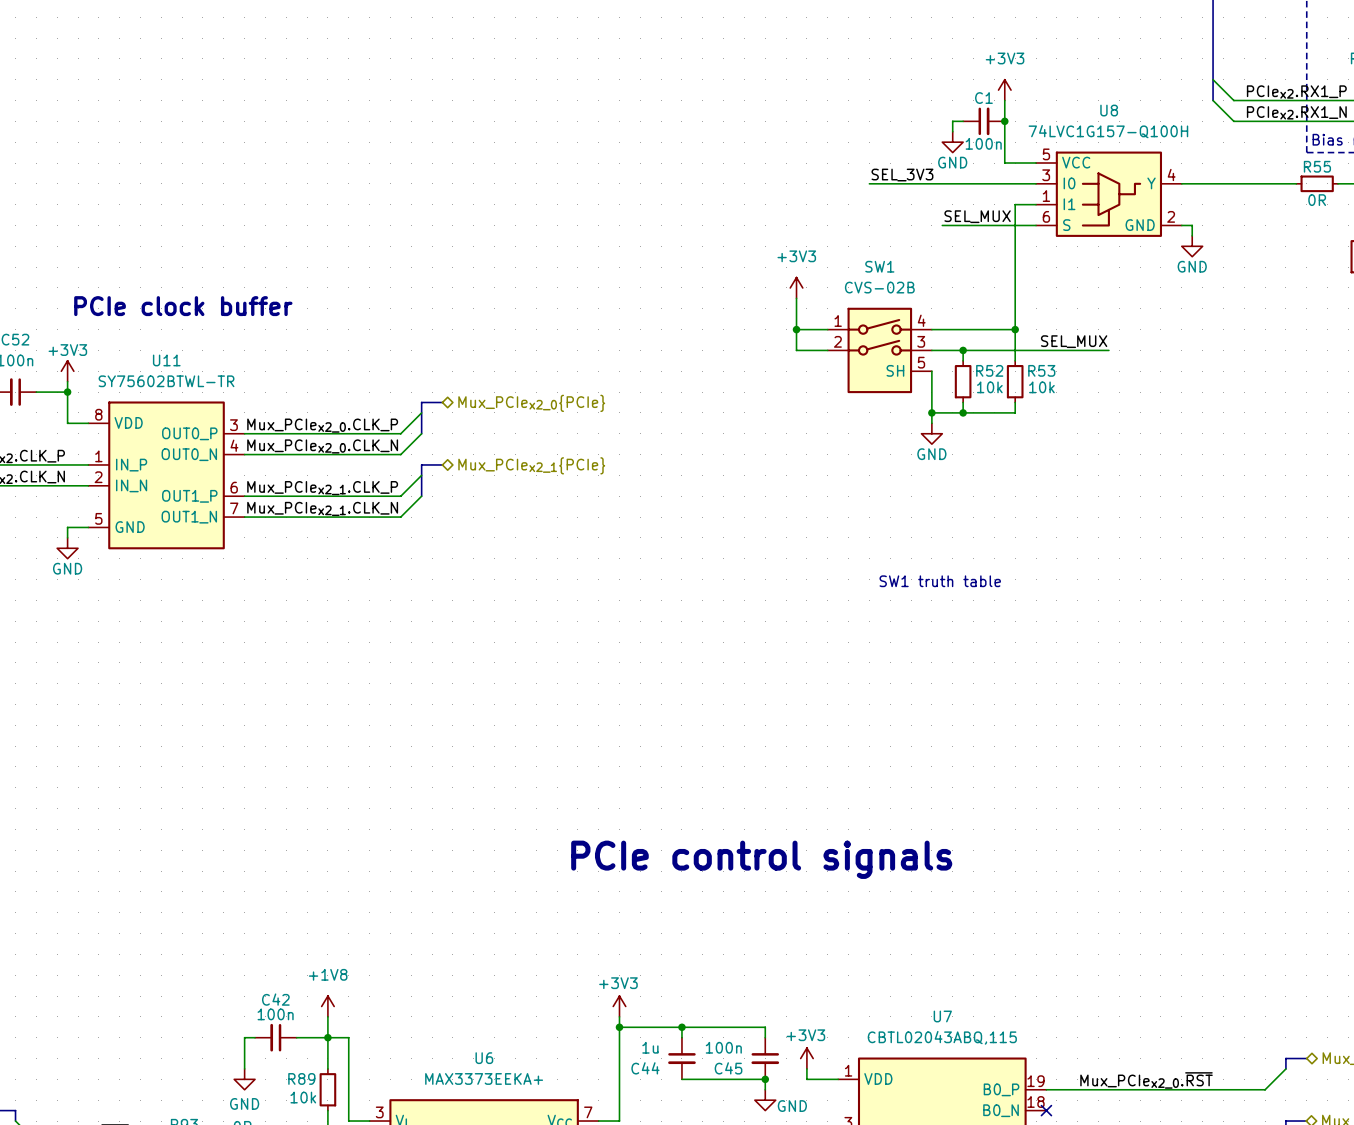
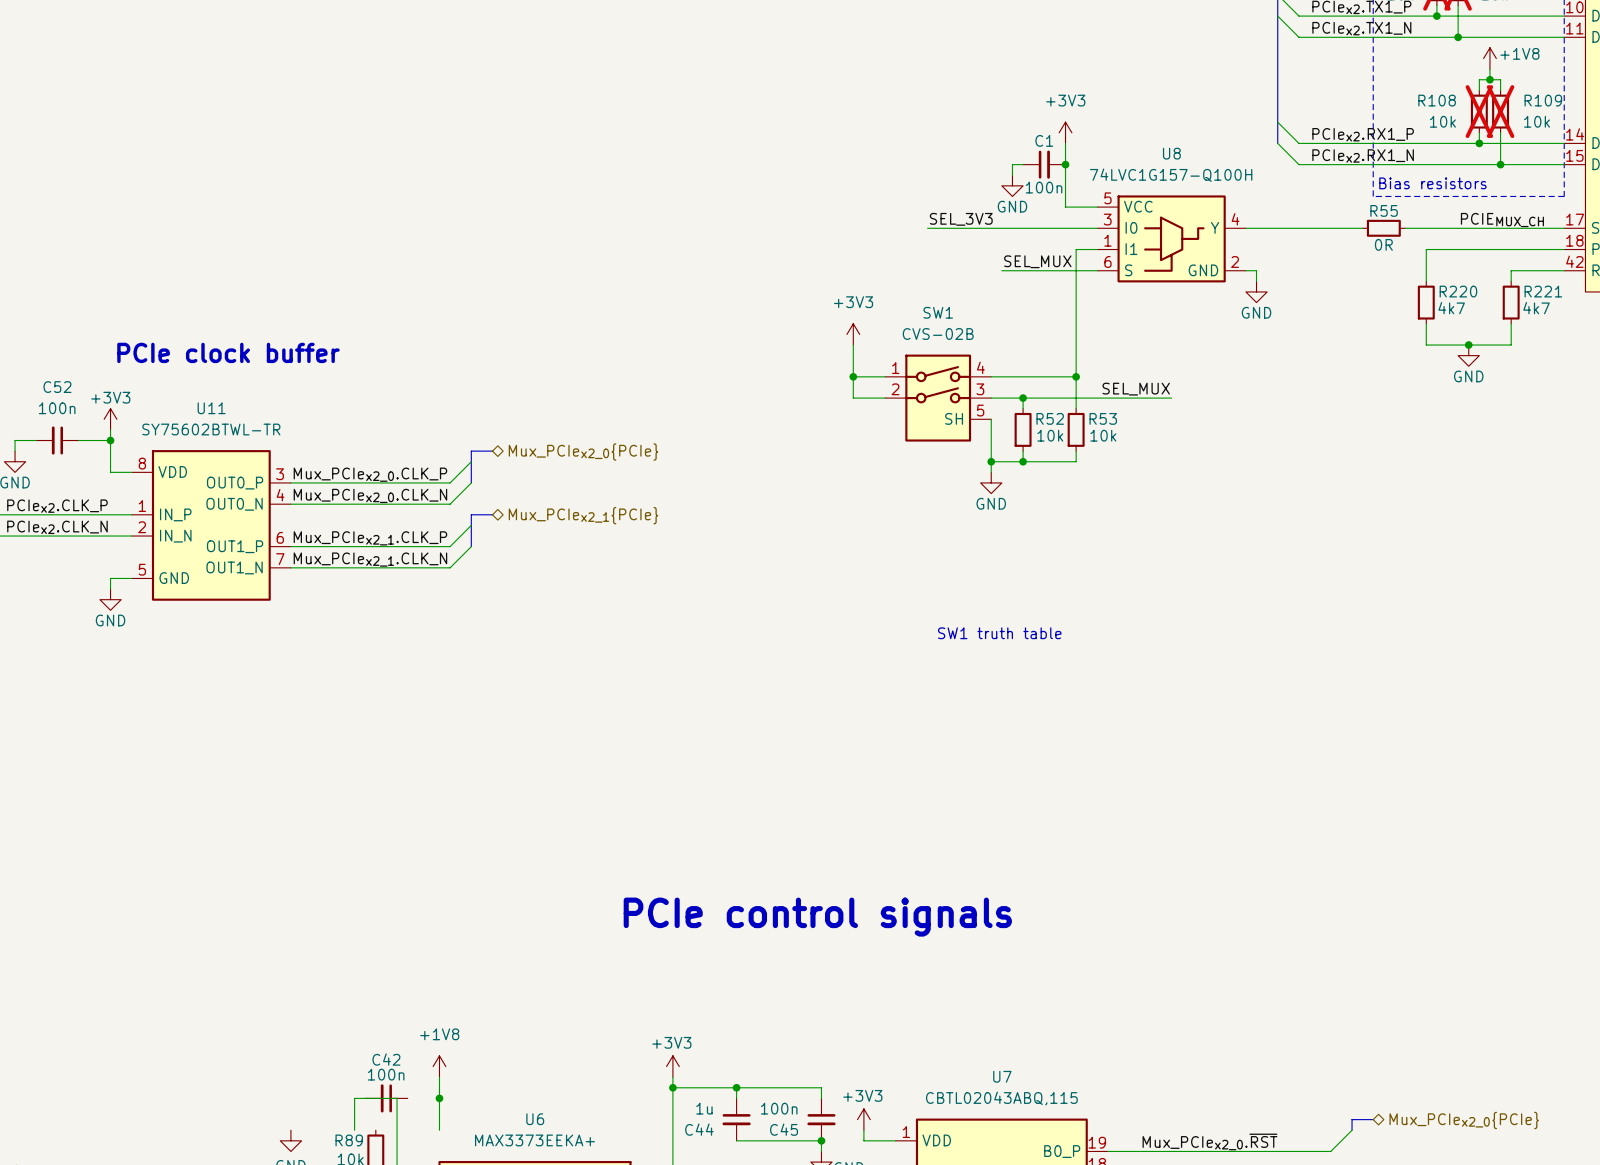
power symbol position: +1V8 (327, 1006) -> +1V8 (439, 1066)
wire: (327, 1016) (327, 1068) -> (439, 1077) (439, 1130)
wire: (255, 1037) (244, 1037) (244, 1068) -> none
C42 position: (275, 1037) -> (386, 1098)
wire: (296, 1037) (307, 1037) -> (354, 1130) (354, 1098)
junction: (327, 1037) -> none
junction: none -> (439, 1098)

